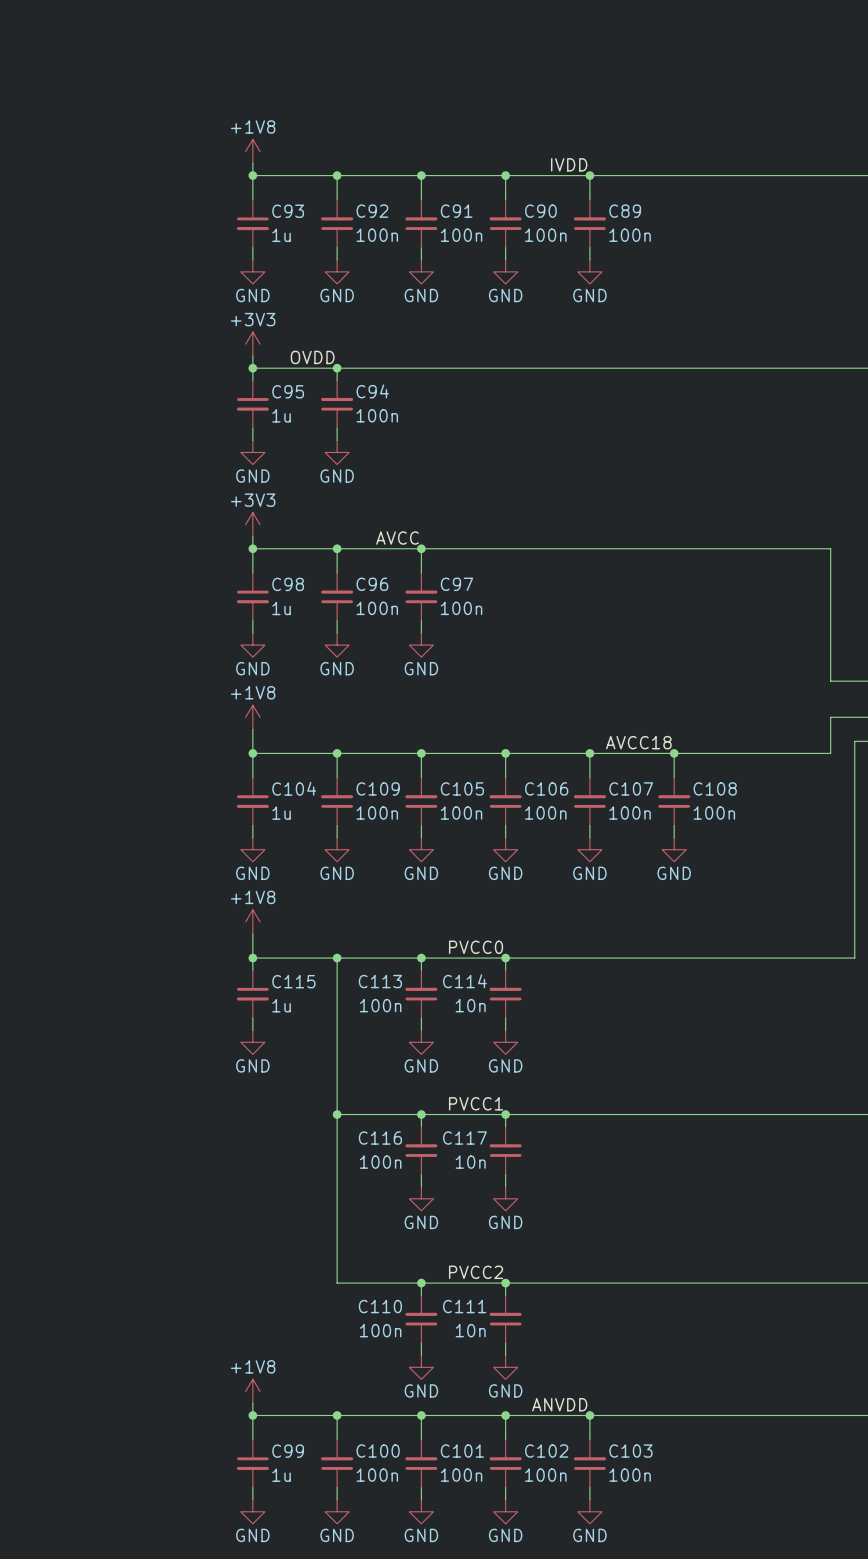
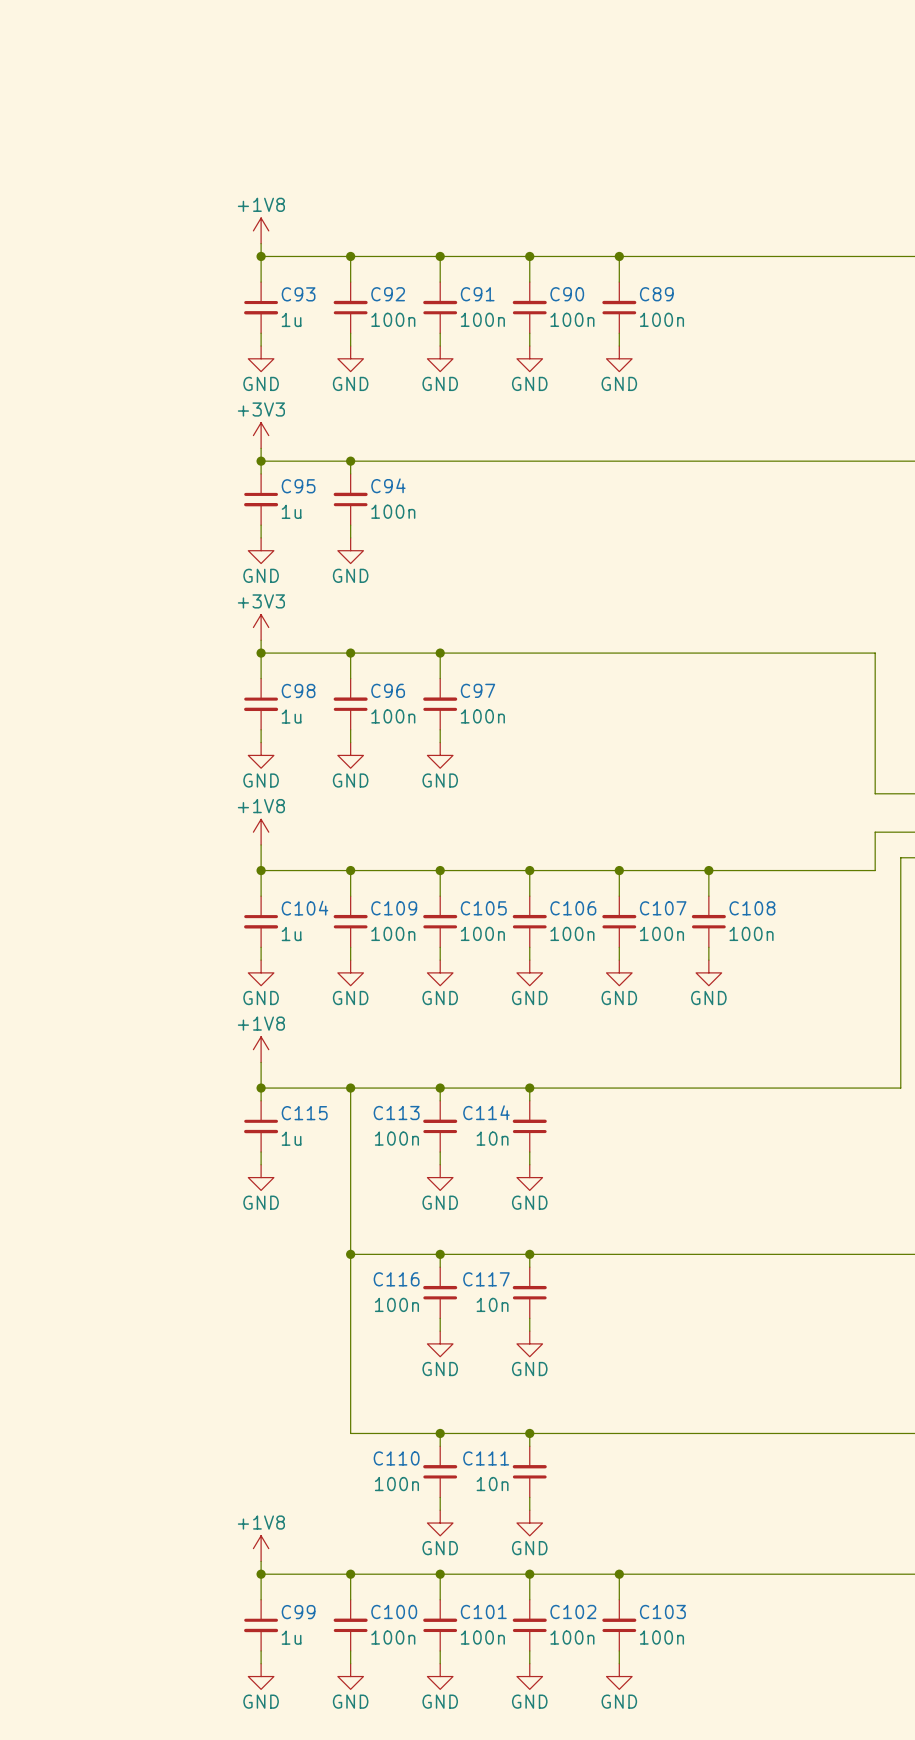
label: IVDD (569, 164) -> none
label: OVDD (312, 357) -> none
label: AVCC (397, 538) -> none
label: AVCC18 (638, 742) -> none
label: PVCC0 (476, 947) -> none
label: PVCC1 (476, 1103) -> none
label: PVCC2 (476, 1272) -> none
label: ANVDD (559, 1404) -> none

